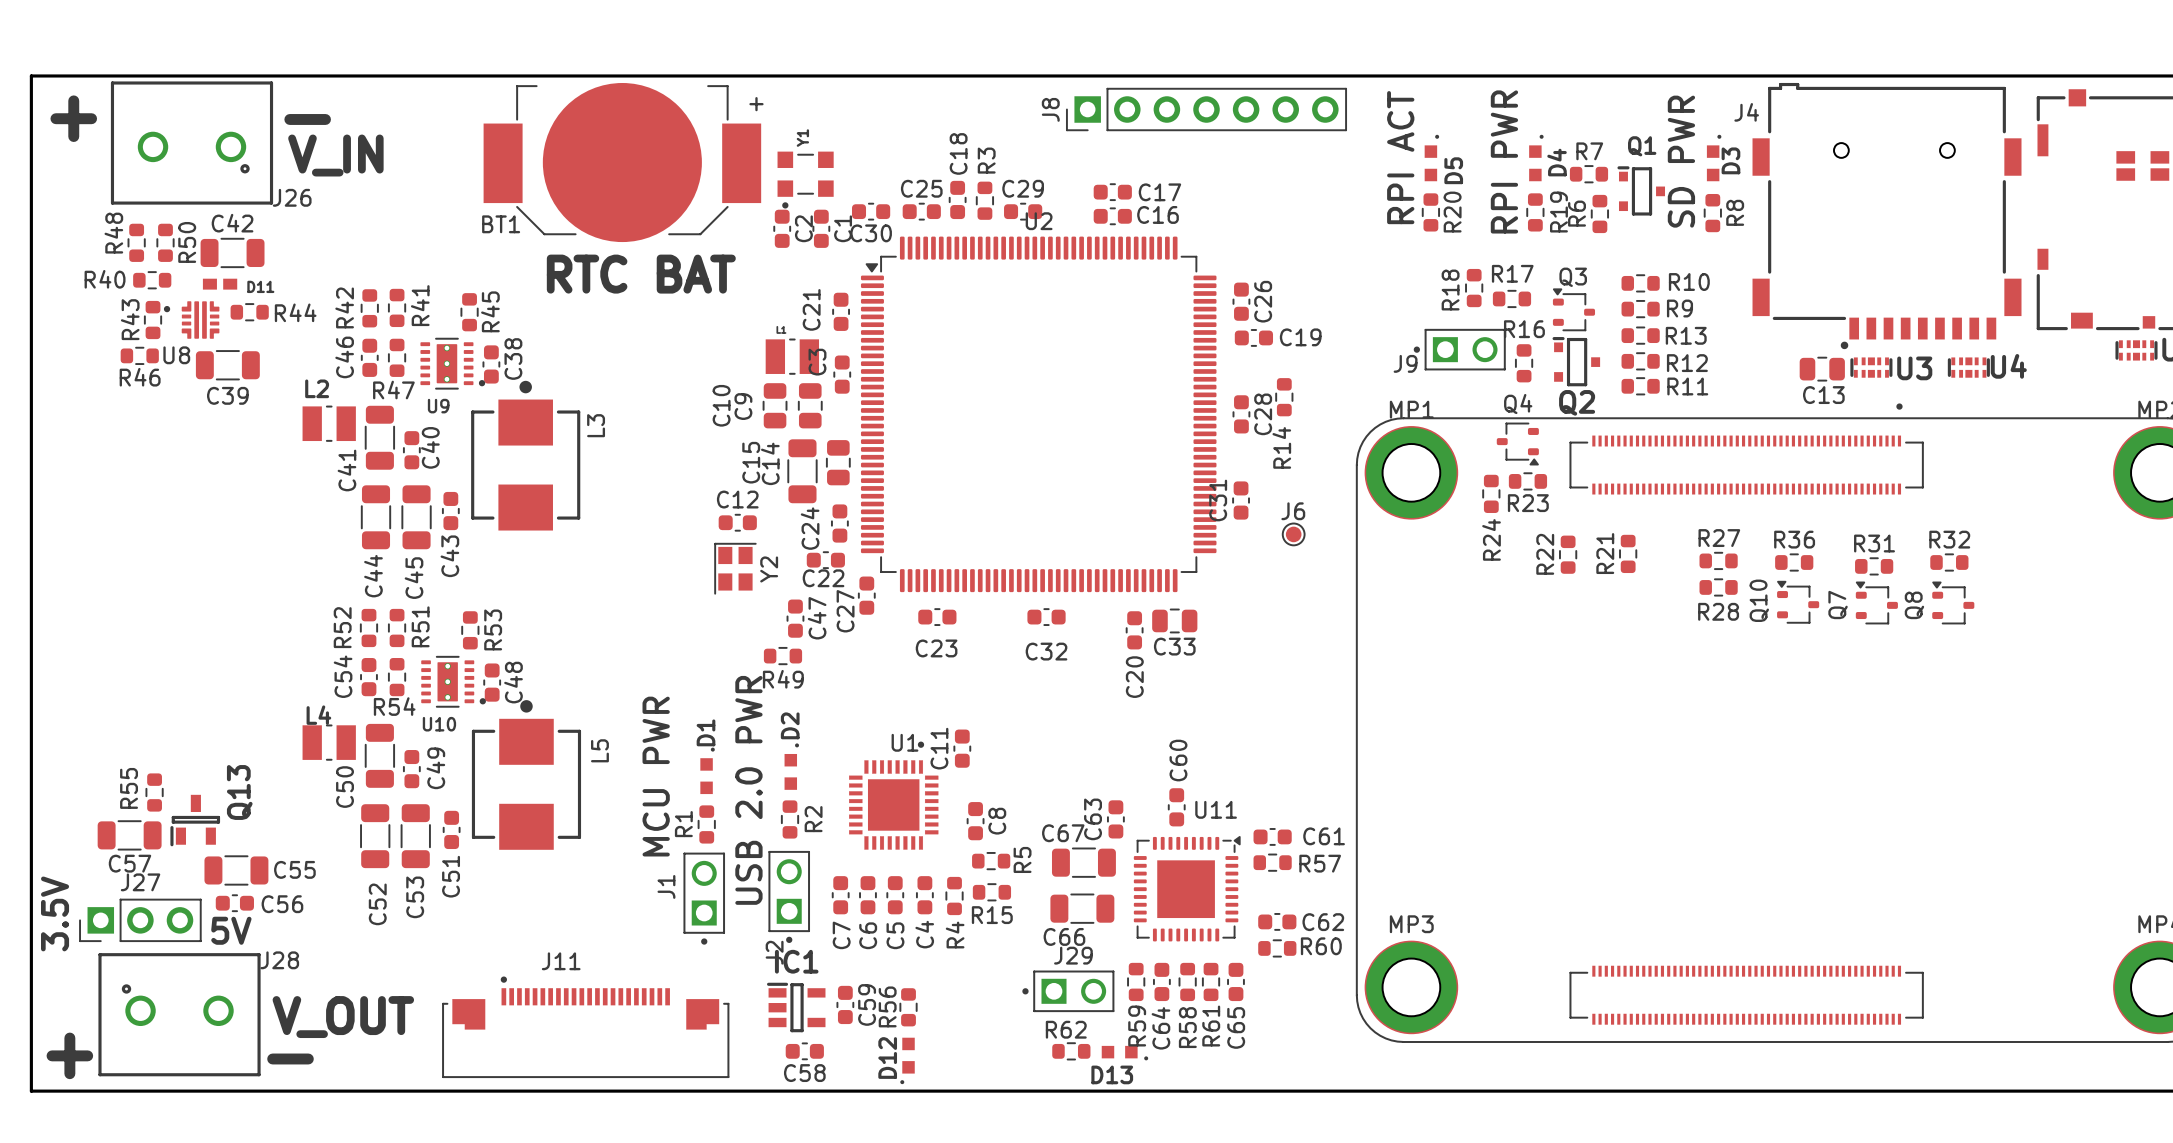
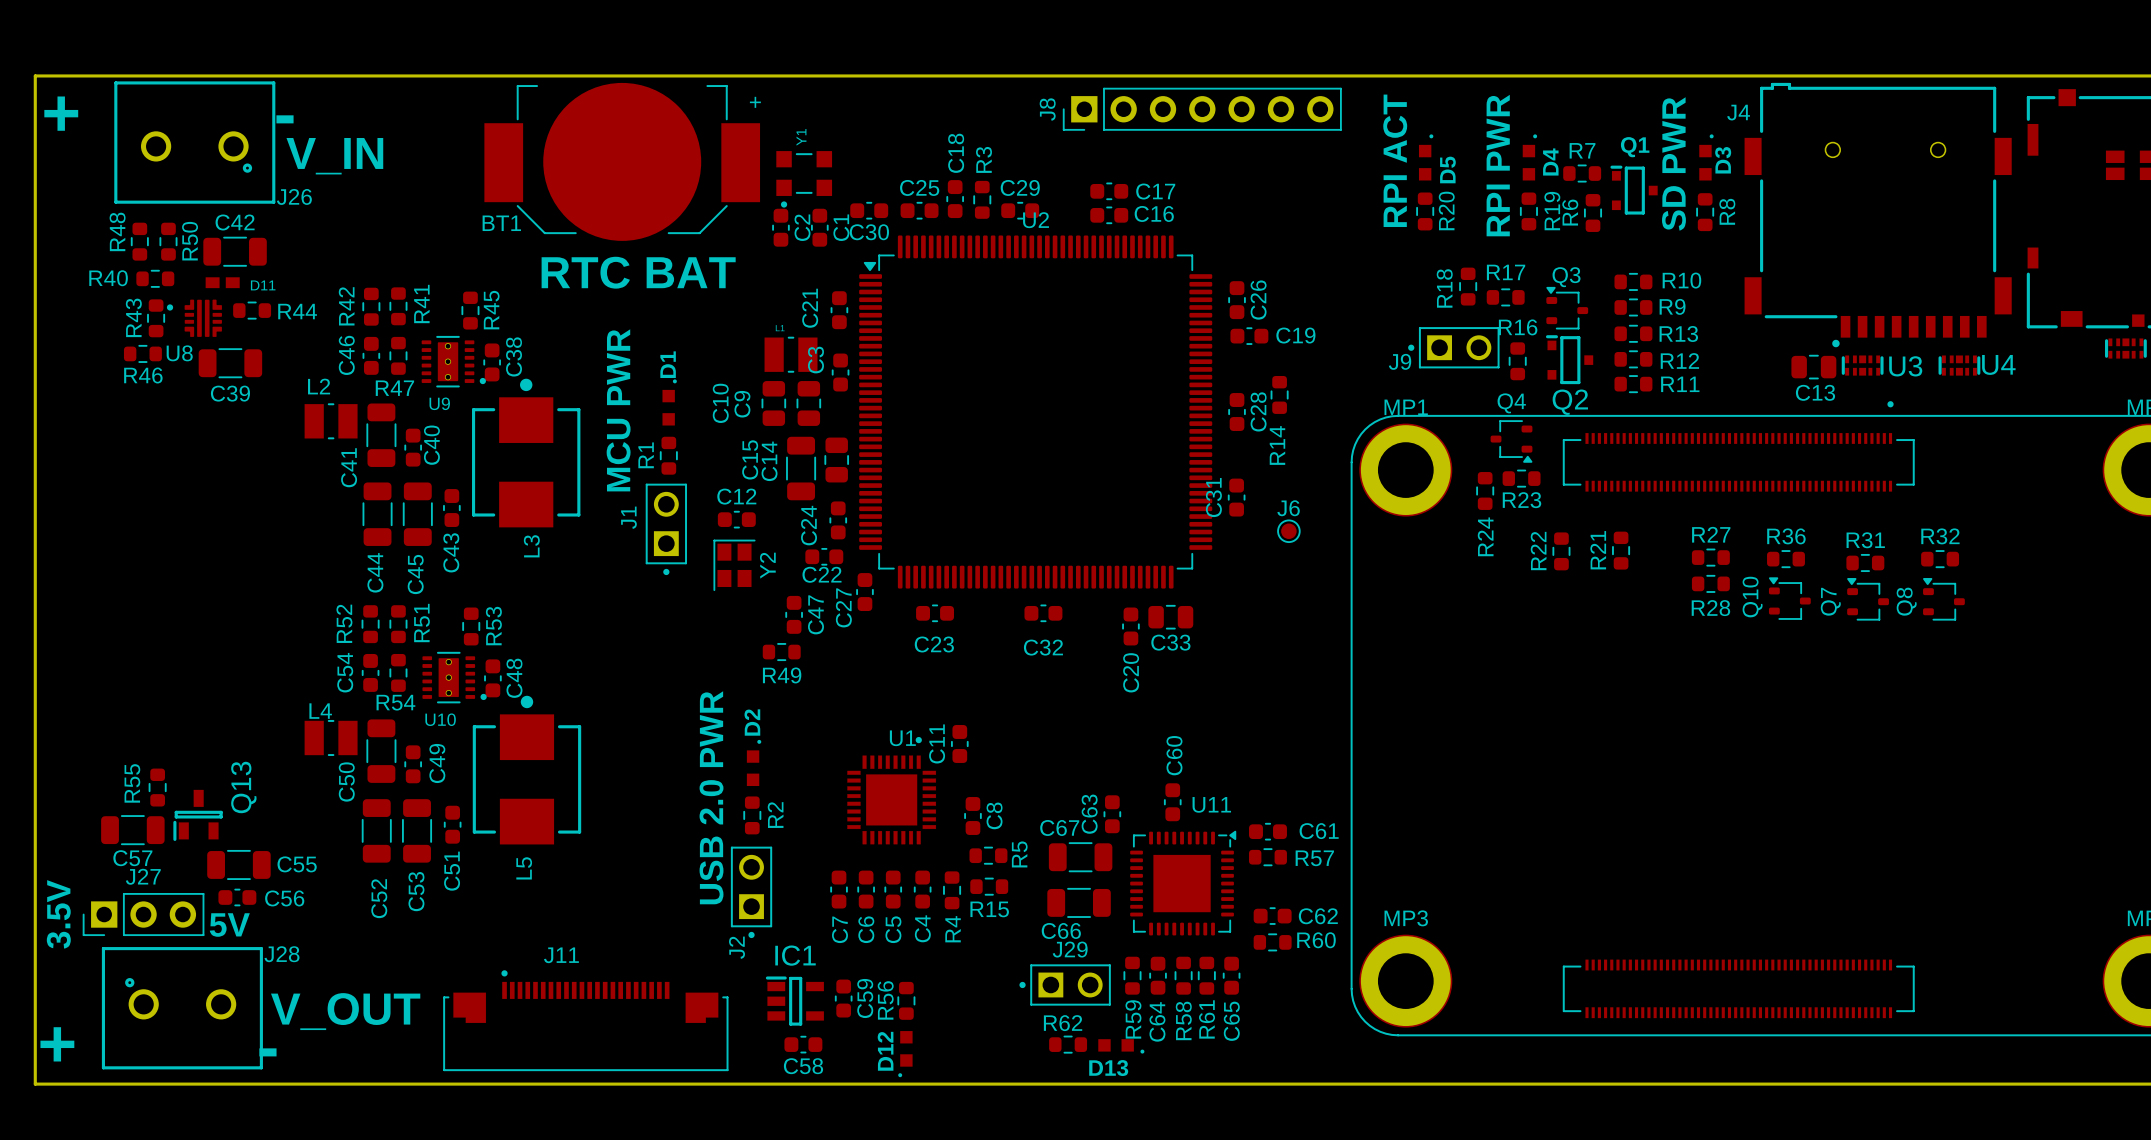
L3 name position: L3 (596, 425) -> L3 (531, 546)
L5 name position: L5 (599, 750) -> L5 (524, 868)
D2 position: (791, 766) -> (754, 762)
D1 position: (707, 770) -> (669, 402)
text position: MCU PWR (656, 776) -> MCU PWR (618, 410)
text position: USB 2.0 PWR (748, 790) -> USB 2.0 PWR (711, 797)
R2 position: (790, 819) -> (752, 815)
R1 position: (706, 824) -> (668, 455)
J2 position: (789, 896) -> (751, 892)
J1 position: (704, 898) -> (666, 529)

